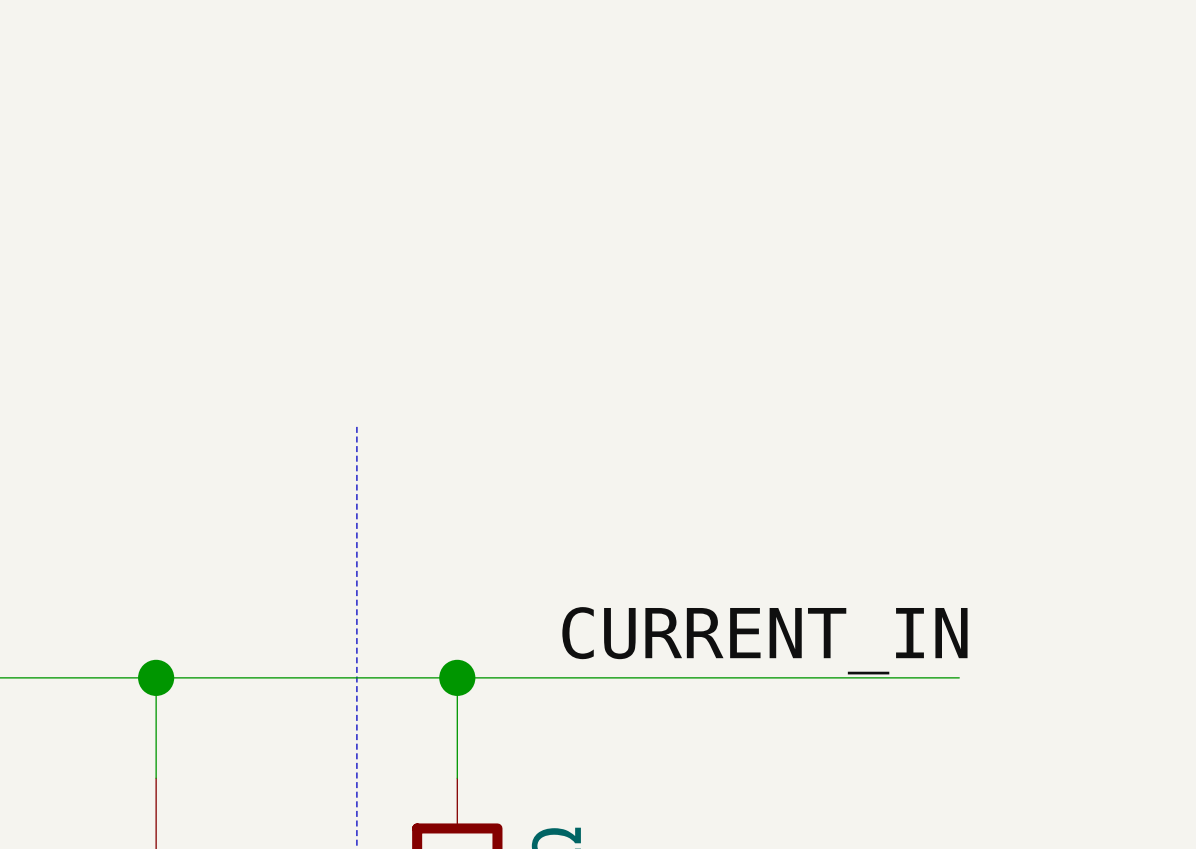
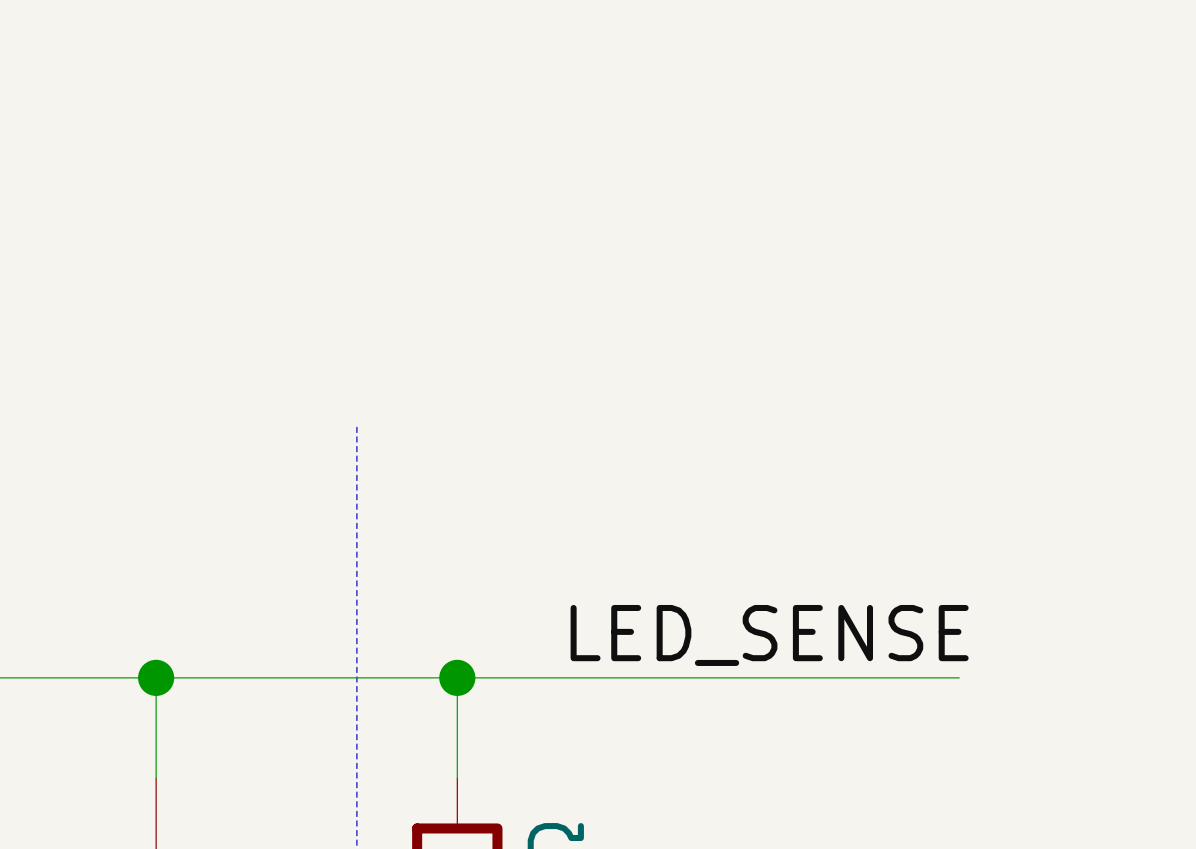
label: CURRENT_IN (764, 640) -> LED_SENSE (769, 635)

